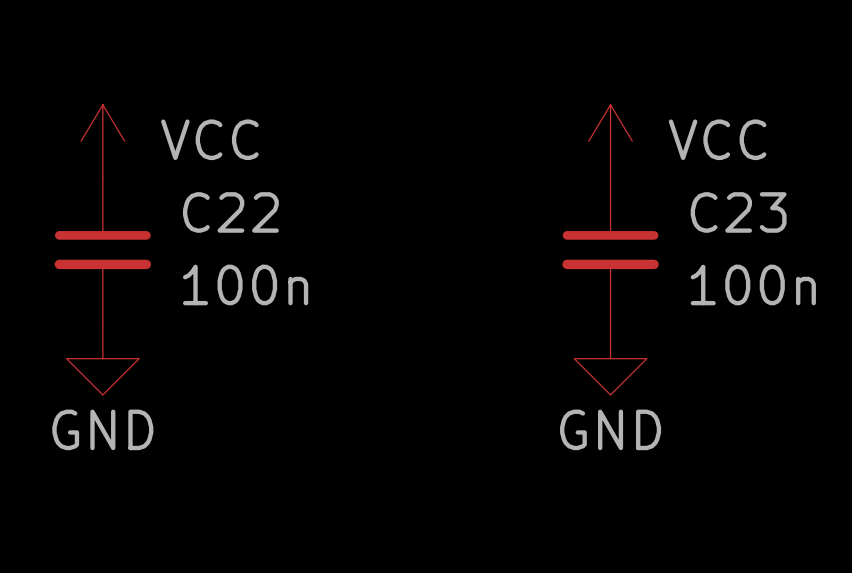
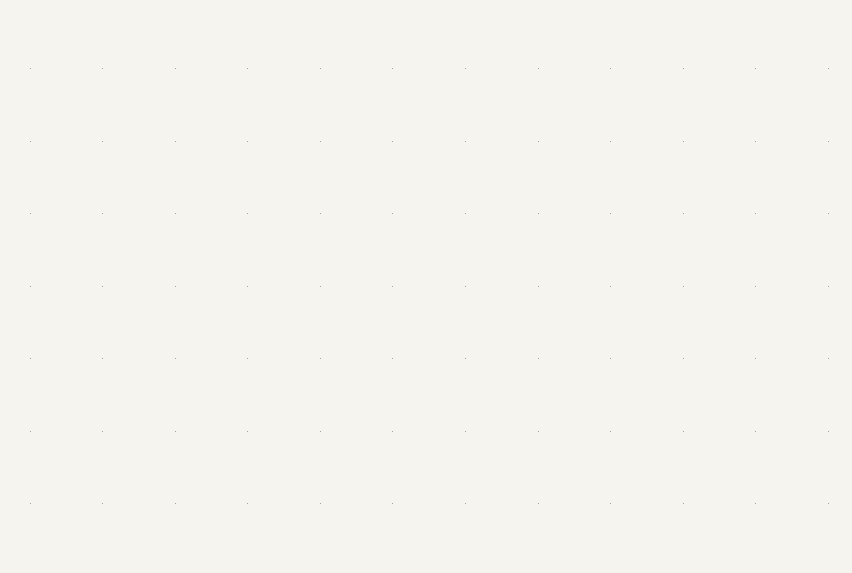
power symbol: VCC (102, 141) -> none
power symbol: VCC (610, 141) -> none
C22: 100n (102, 249) -> none
C23: 100n (610, 249) -> none
power symbol: GND (102, 358) -> none
power symbol: GND (610, 358) -> none

